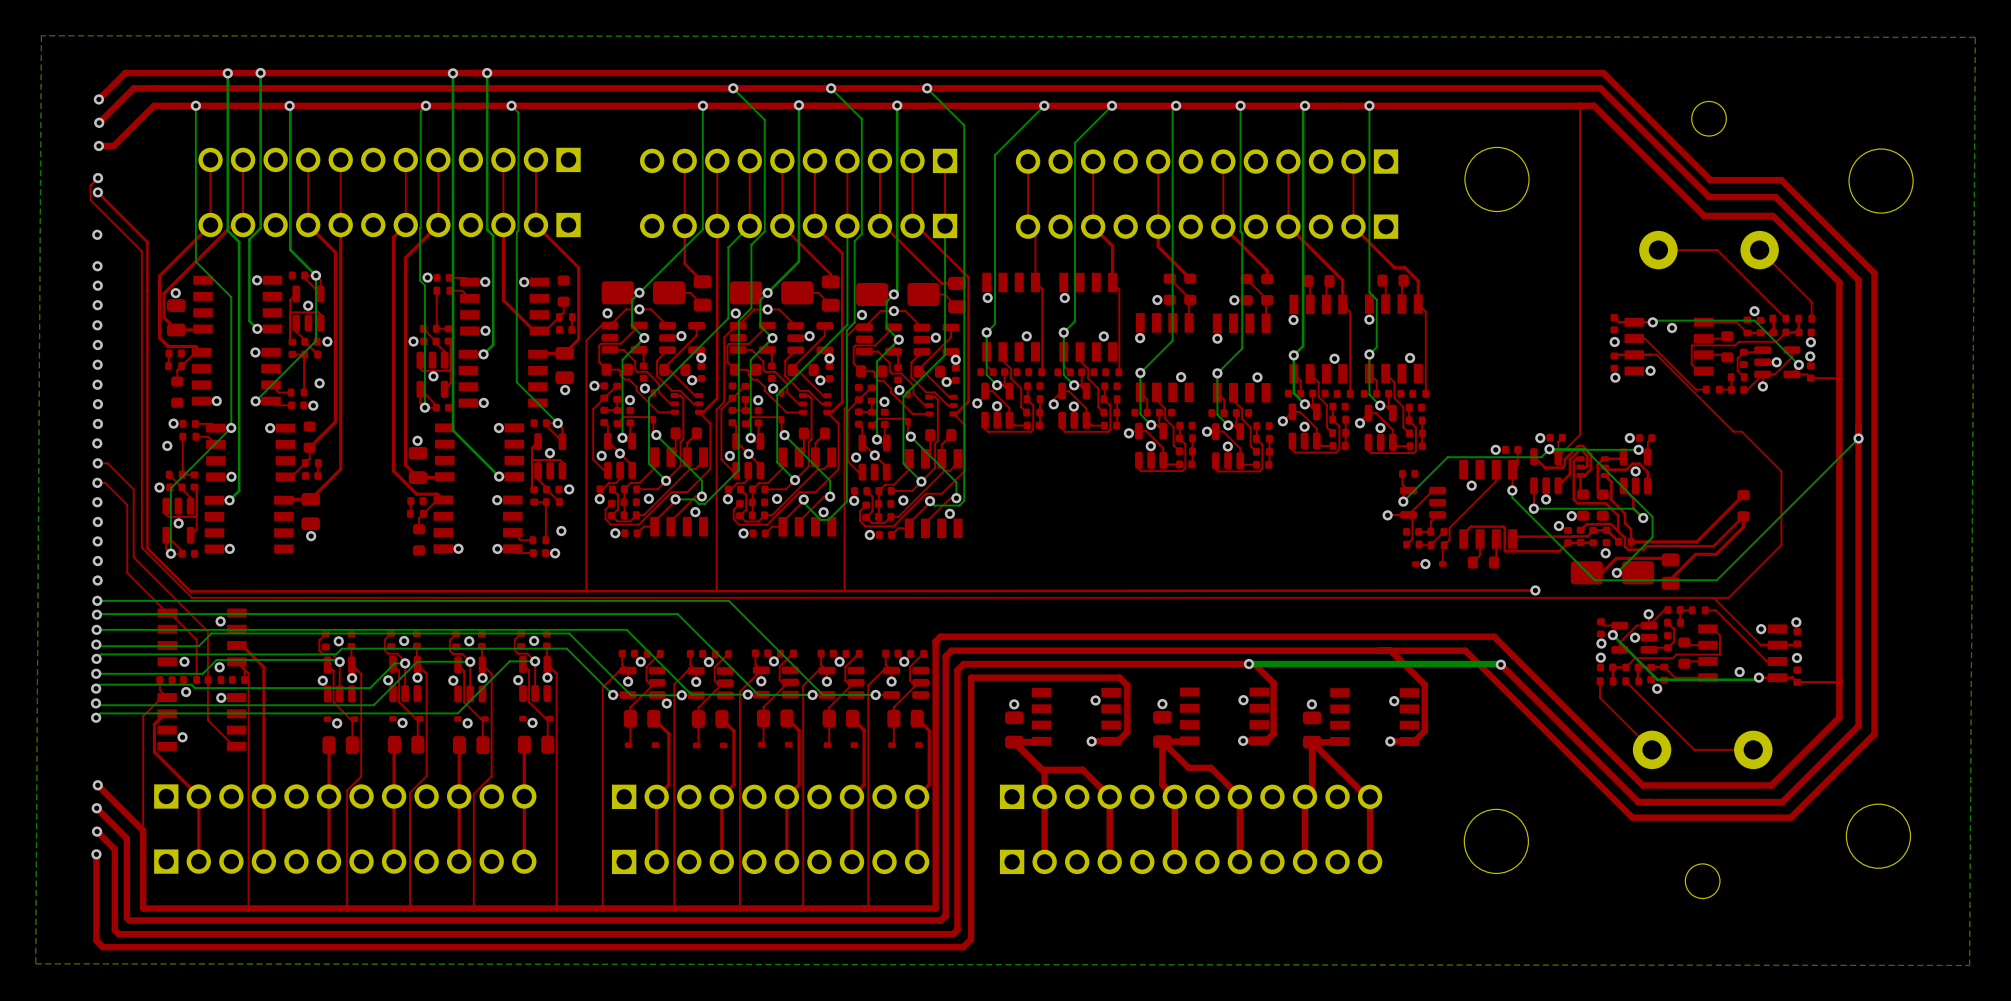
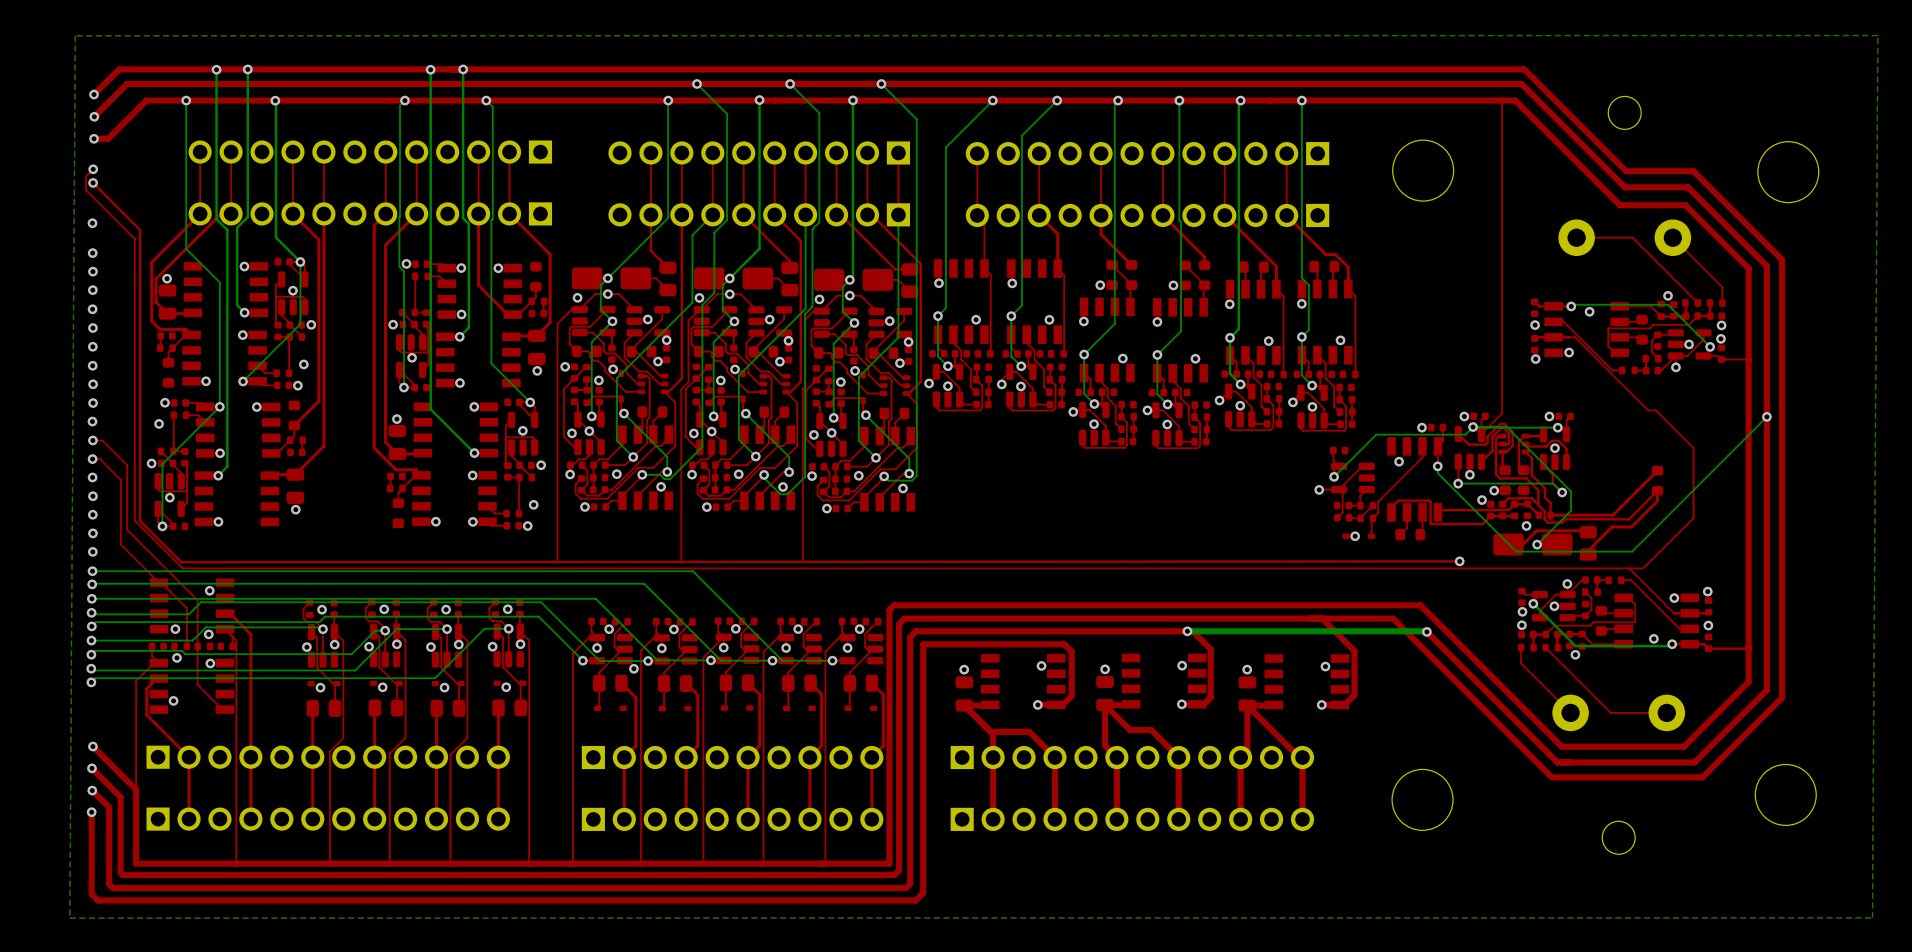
bottom zone outline: (1975, 37) (41, 35) (35, 963) (1969, 965) -> (1877, 35) (75, 35) (69, 918) (1872, 917)

